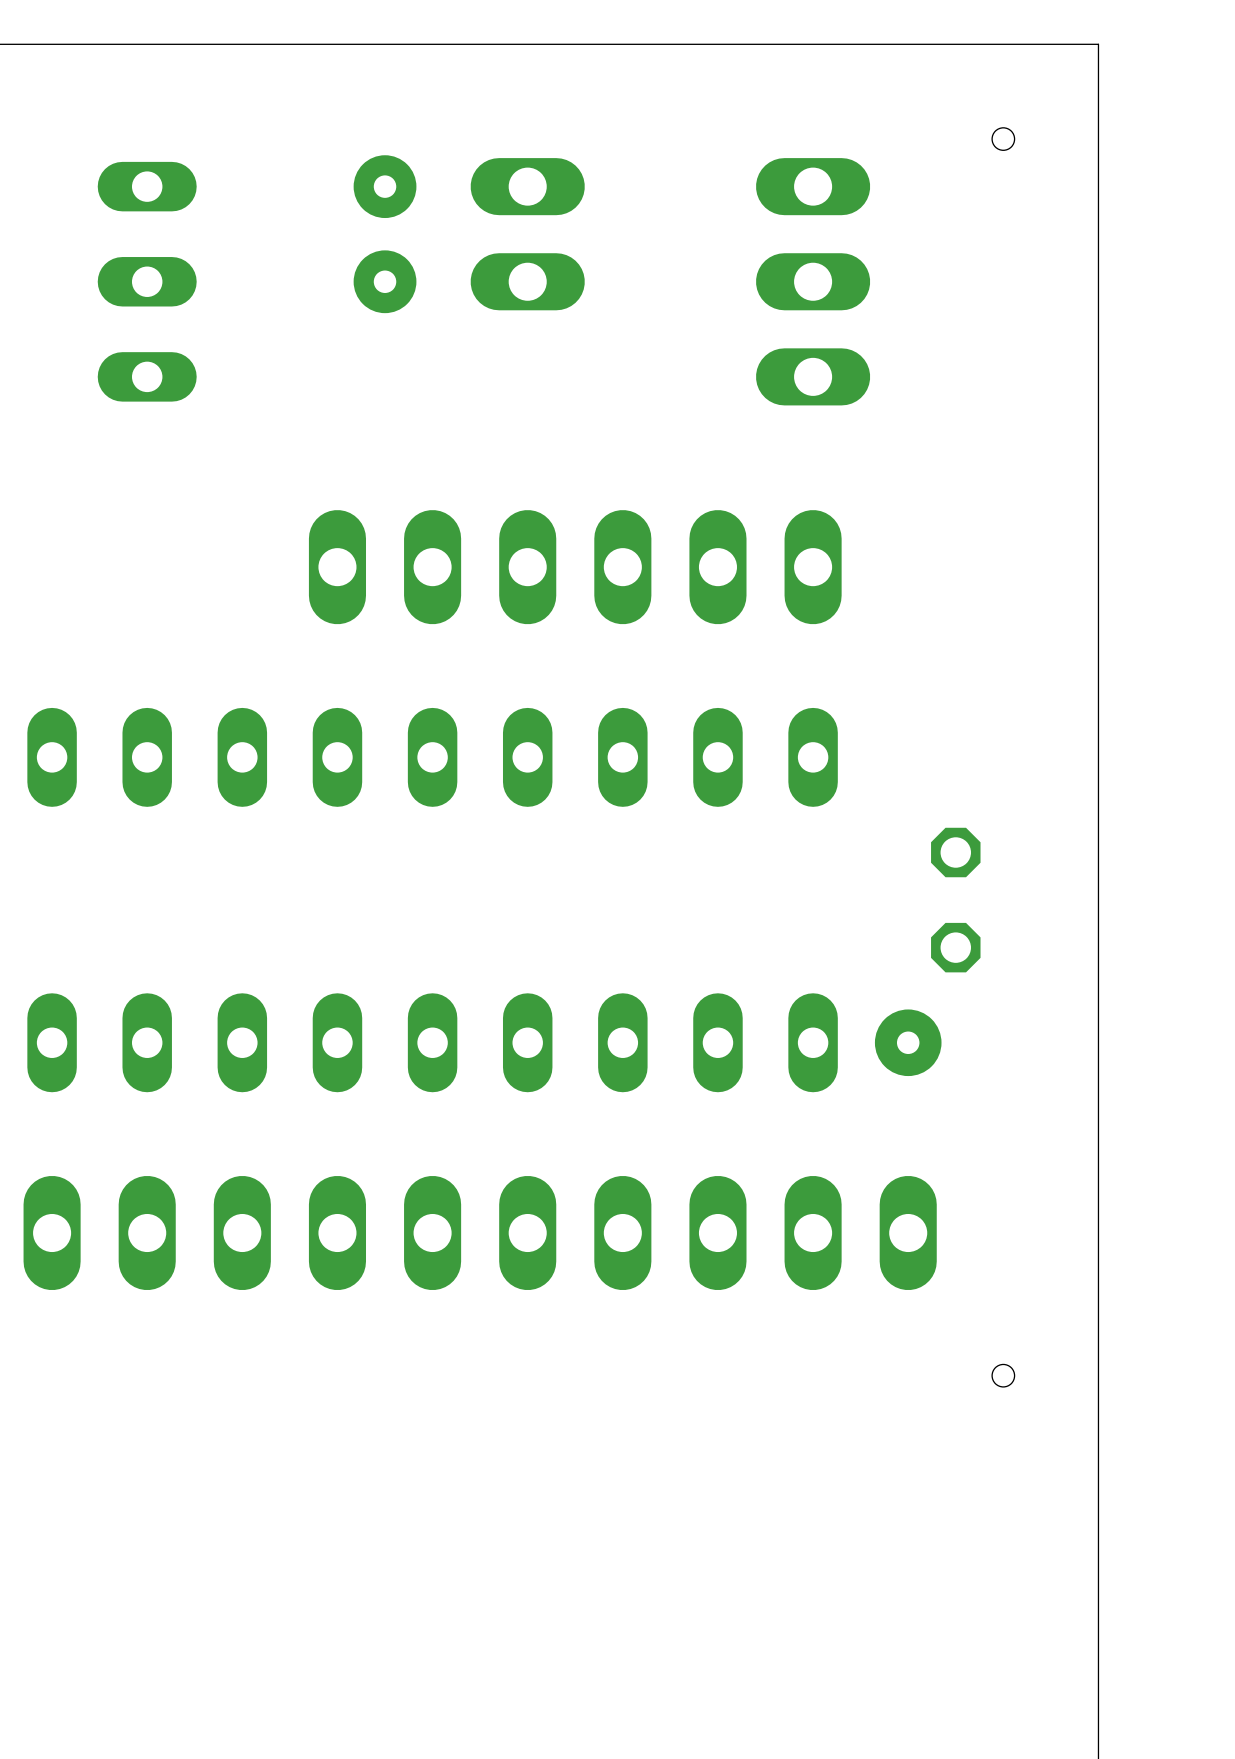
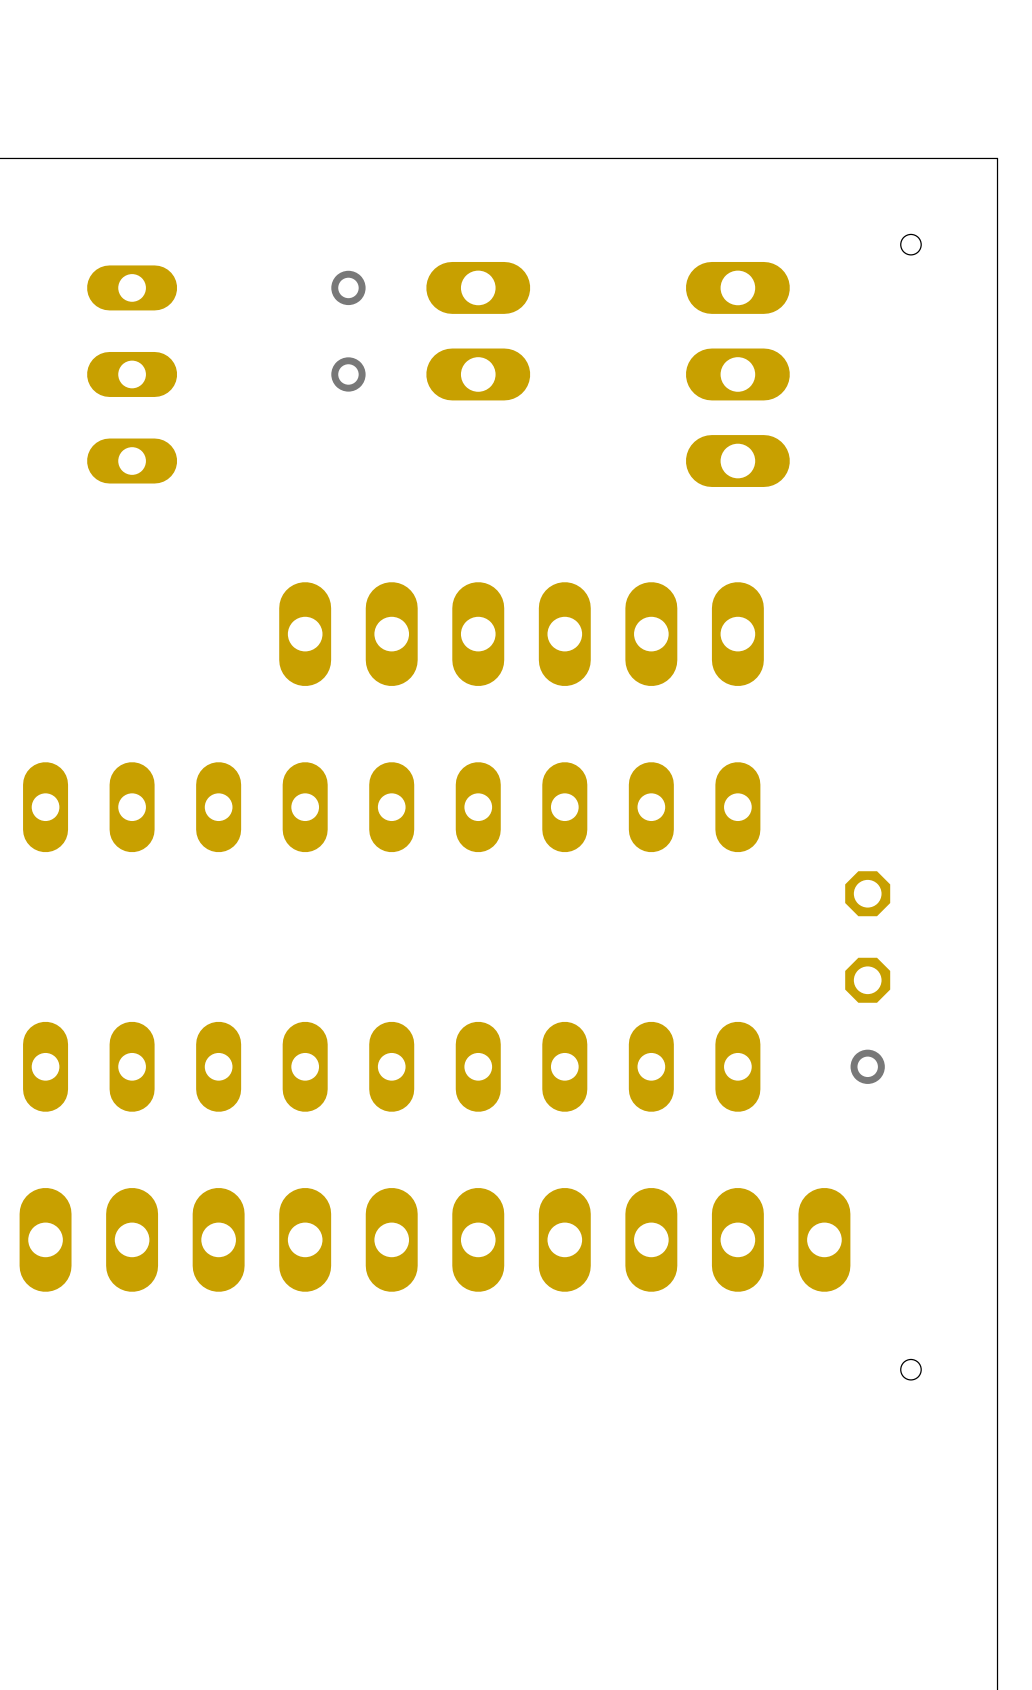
via size: [353, 155, 417, 219] -> [331, 270, 366, 306]
via size: [353, 250, 417, 314] -> [331, 357, 366, 392]
via: (908, 1042) -> none
via: none -> (867, 1066)

